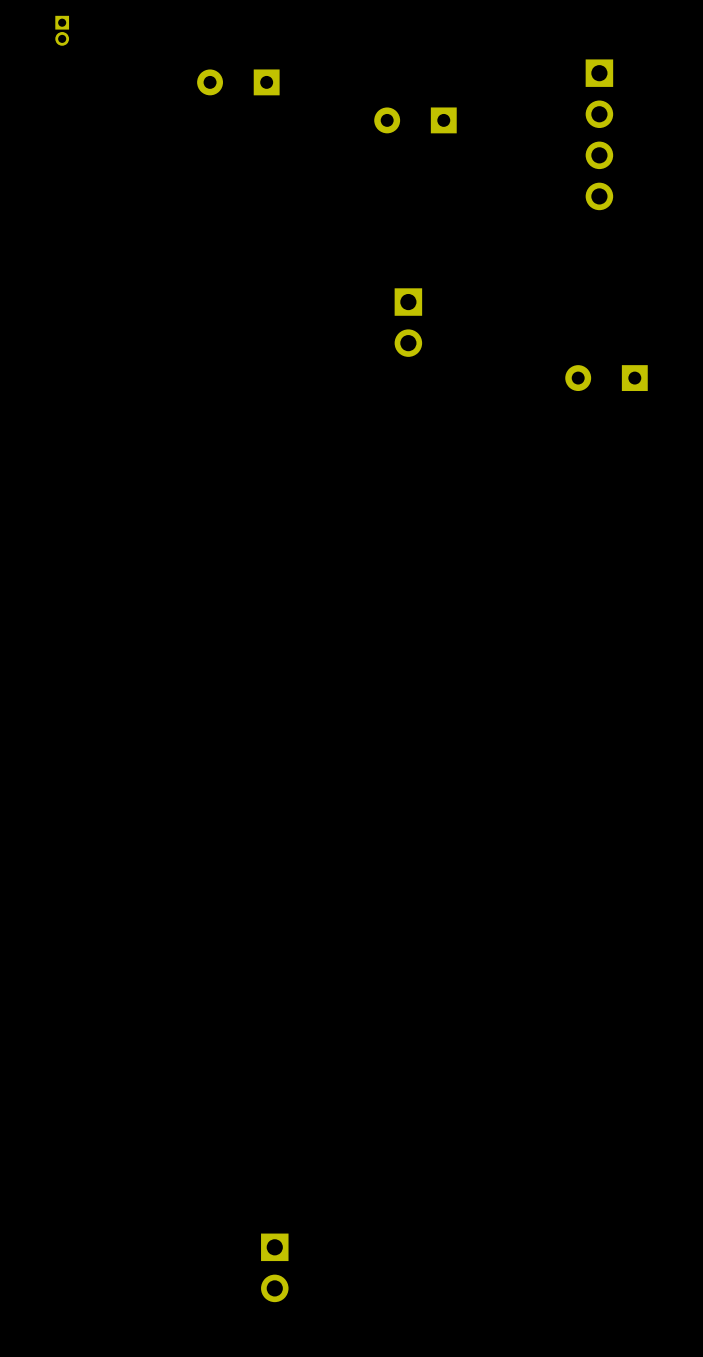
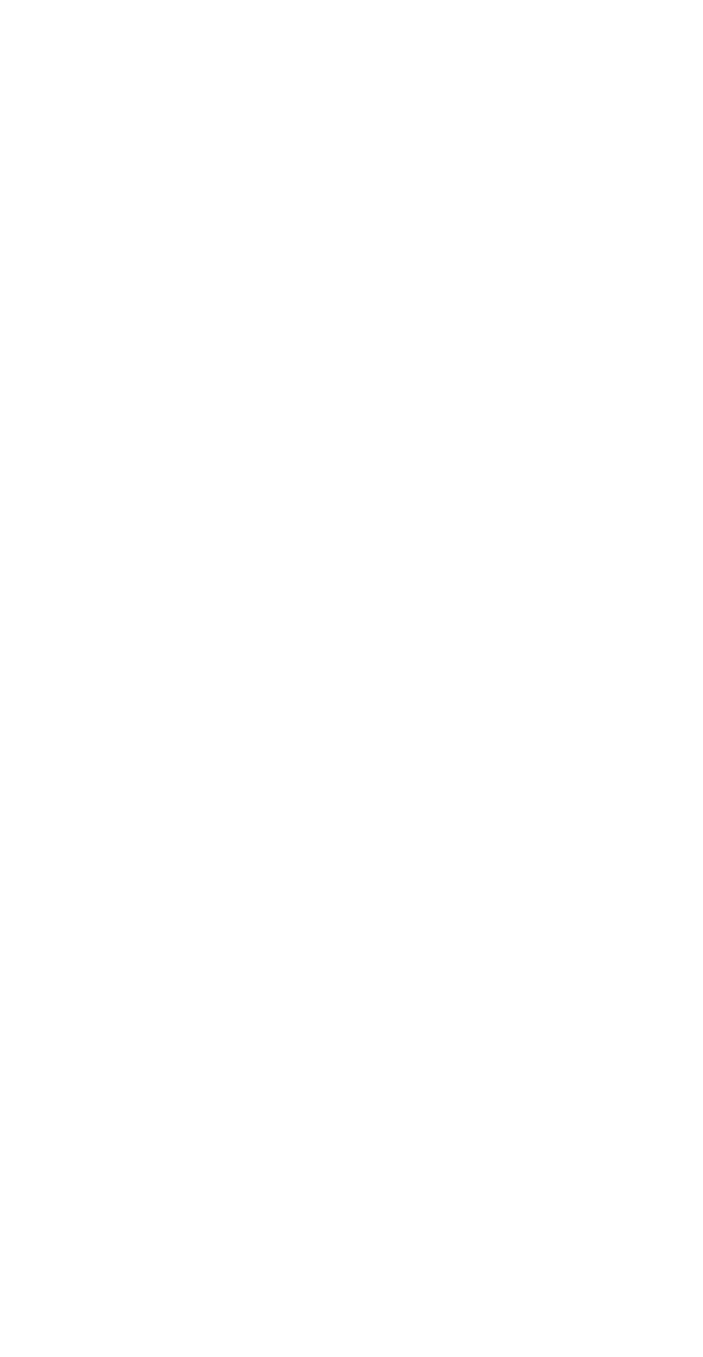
part: (62, 30) -> none
part: (238, 82) -> none
part: (415, 120) -> none
part: (599, 134) -> none
part: (408, 322) -> none
part: (606, 378) -> none
part: (274, 1267) -> none

